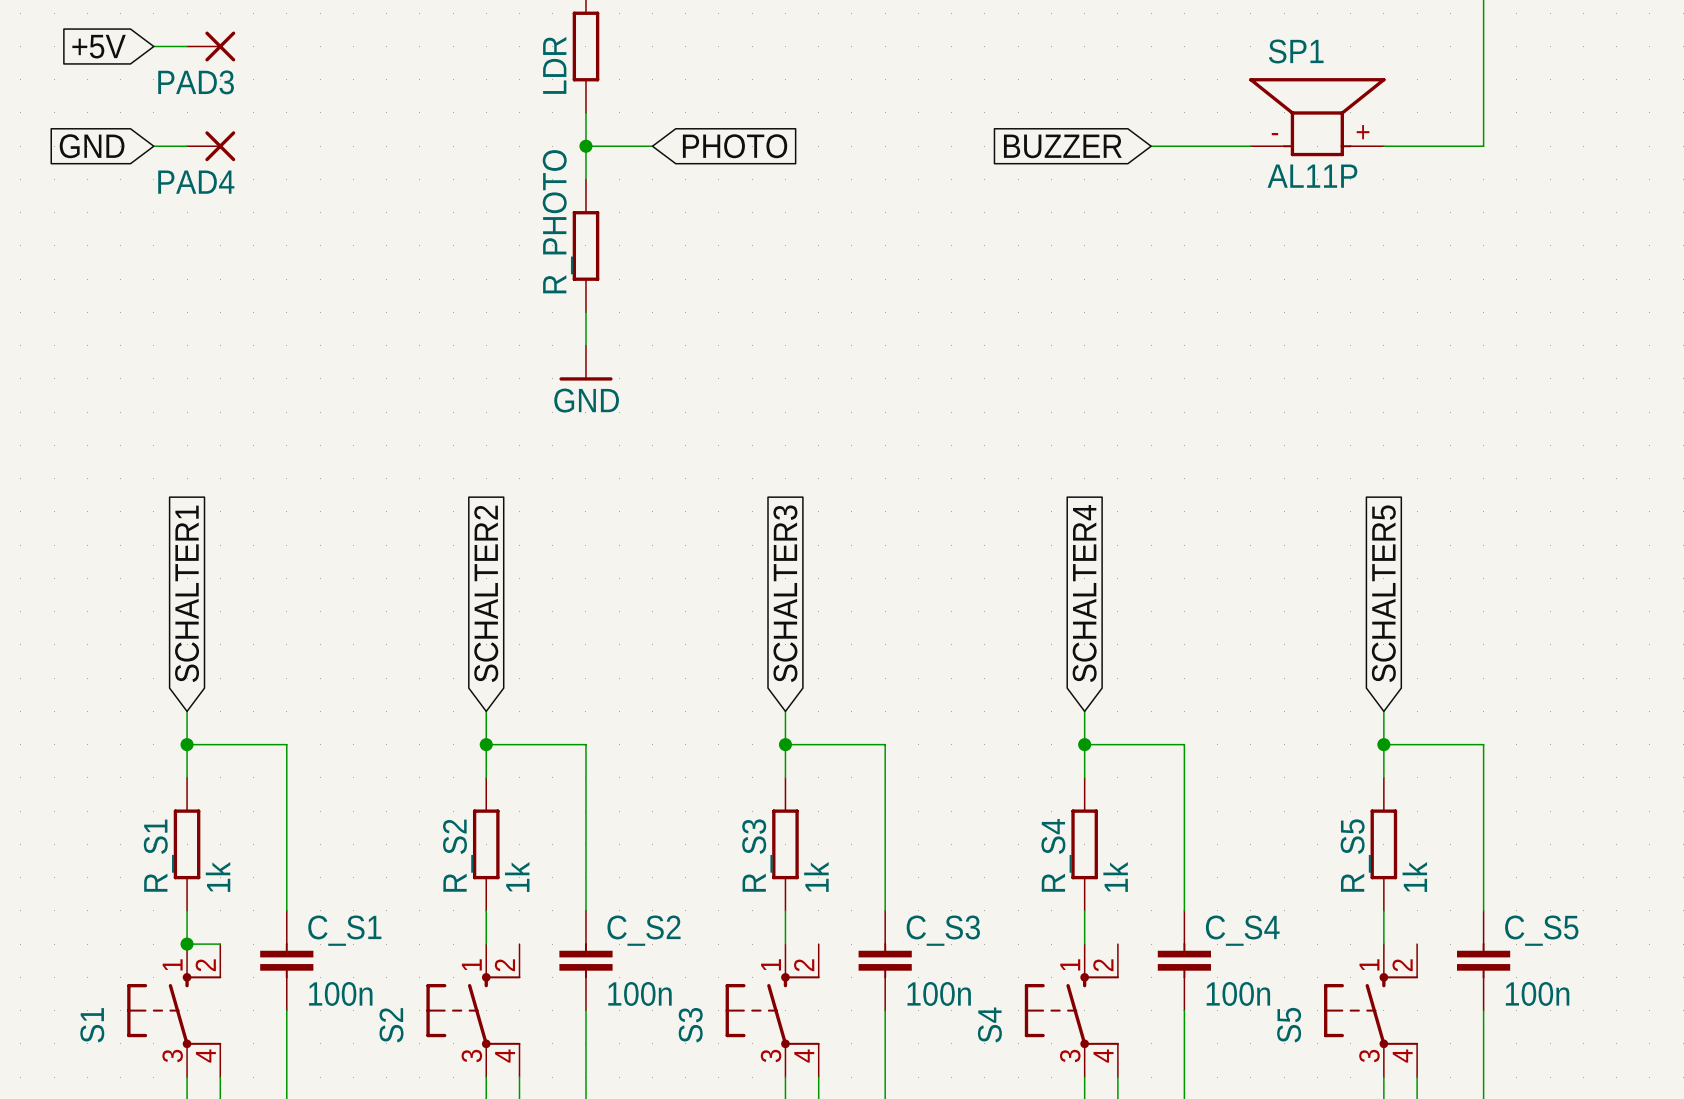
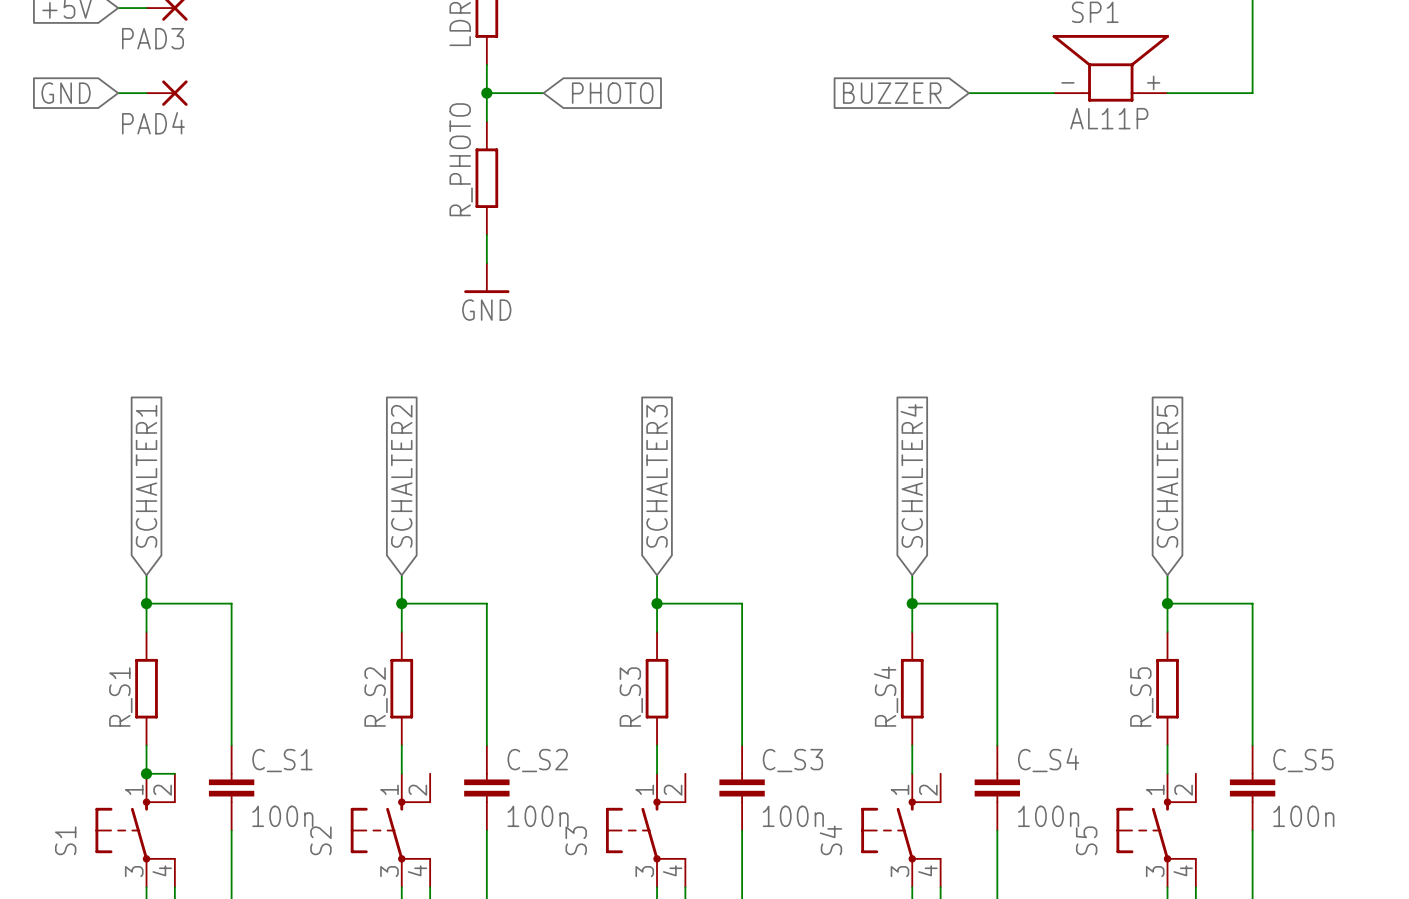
R_S1 value: 1k (218, 876) -> none
R_S2 value: 1k (517, 876) -> none
R_S3 value: 1k (816, 876) -> none
R_S4 value: 1k (1115, 876) -> none
R_S5 value: 1k (1414, 876) -> none

